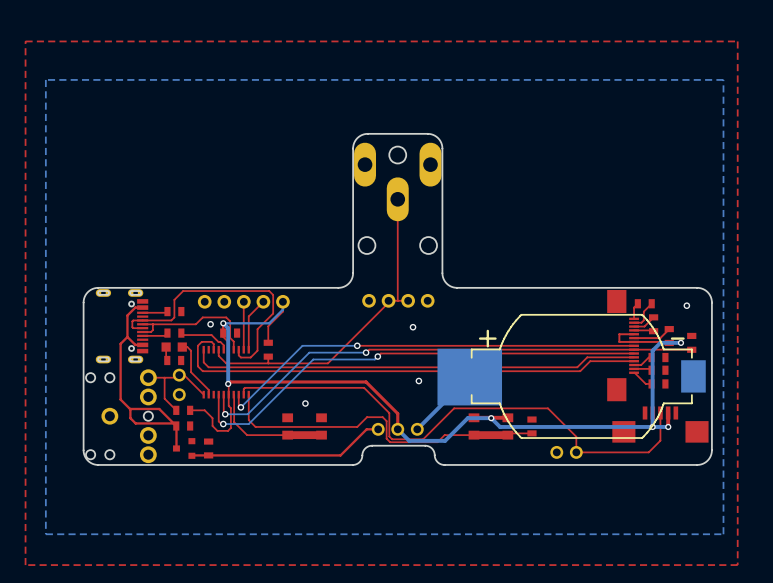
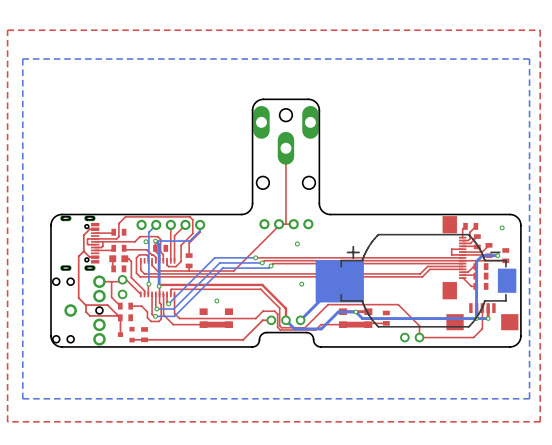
bottom track: none -> (156, 224) (148, 232) (148, 284)
top track: none -> (148, 284) (148, 294)
via: none -> (148, 284)

